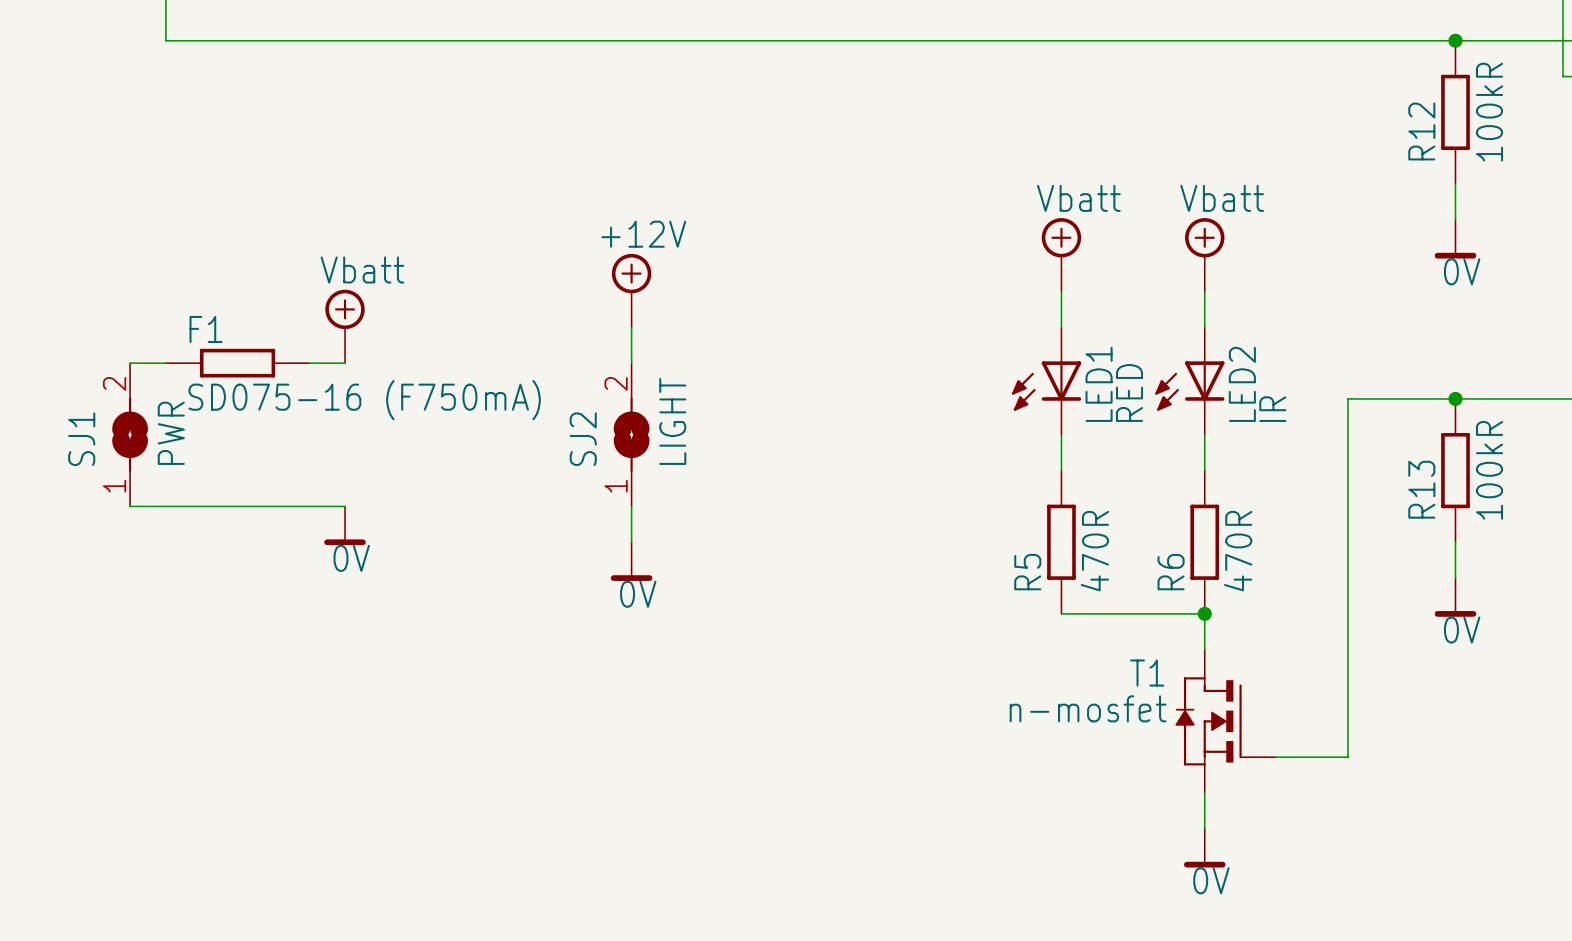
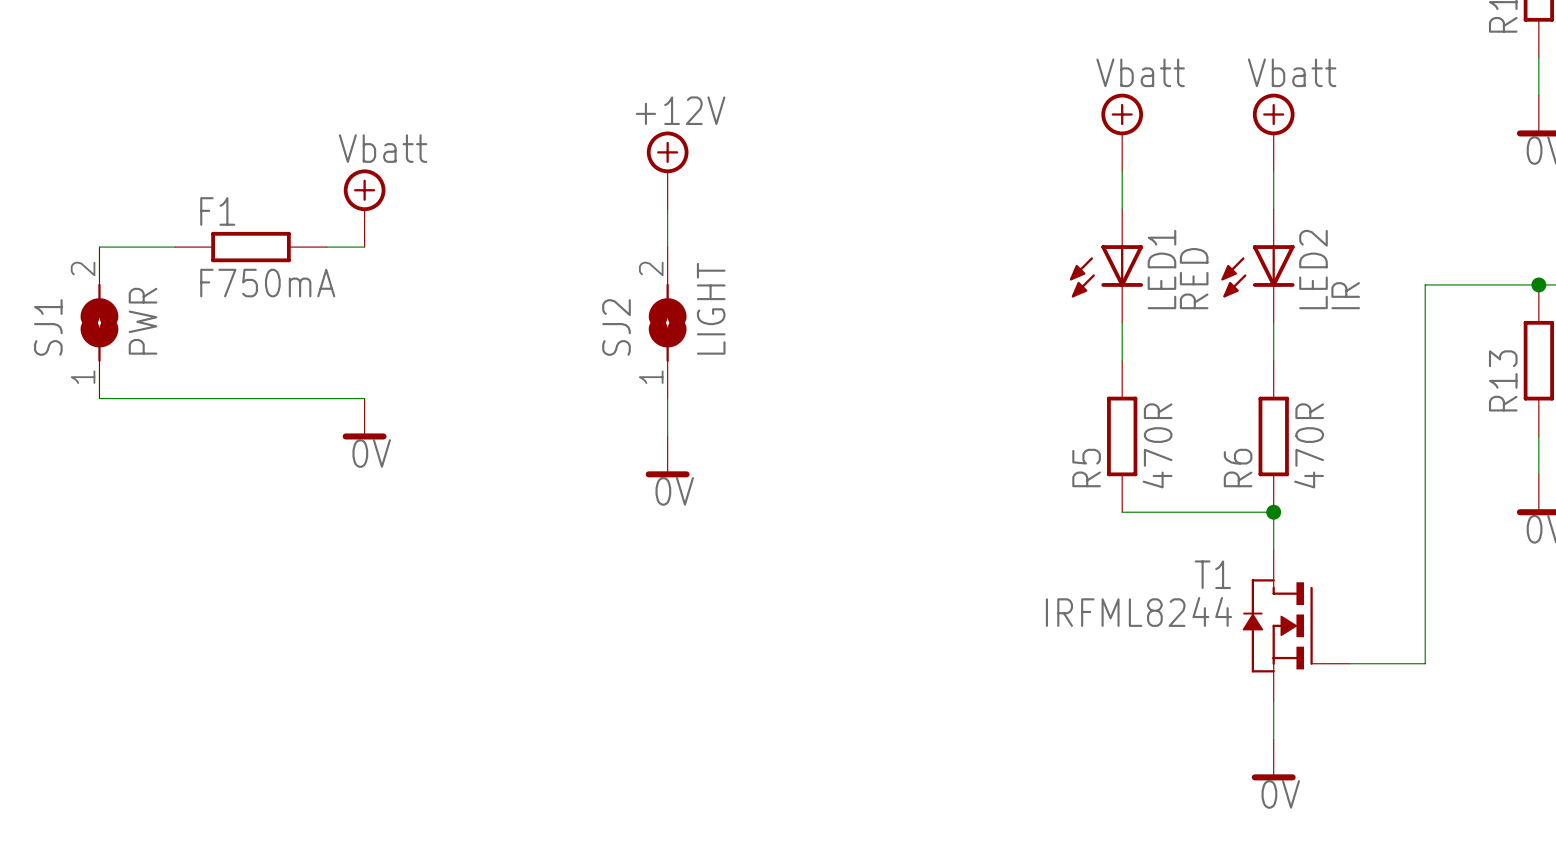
wire: none -> (99, 247) (137, 247)
F1 value: SD075-16 (F750mA) (364, 400) -> F750mA (267, 283)
SJ1 position: (130, 434) -> (99, 322)
wire: none -> (99, 398) (137, 398)
T1 value: n-mosfet (1088, 708) -> IRFML8244 (1138, 611)

